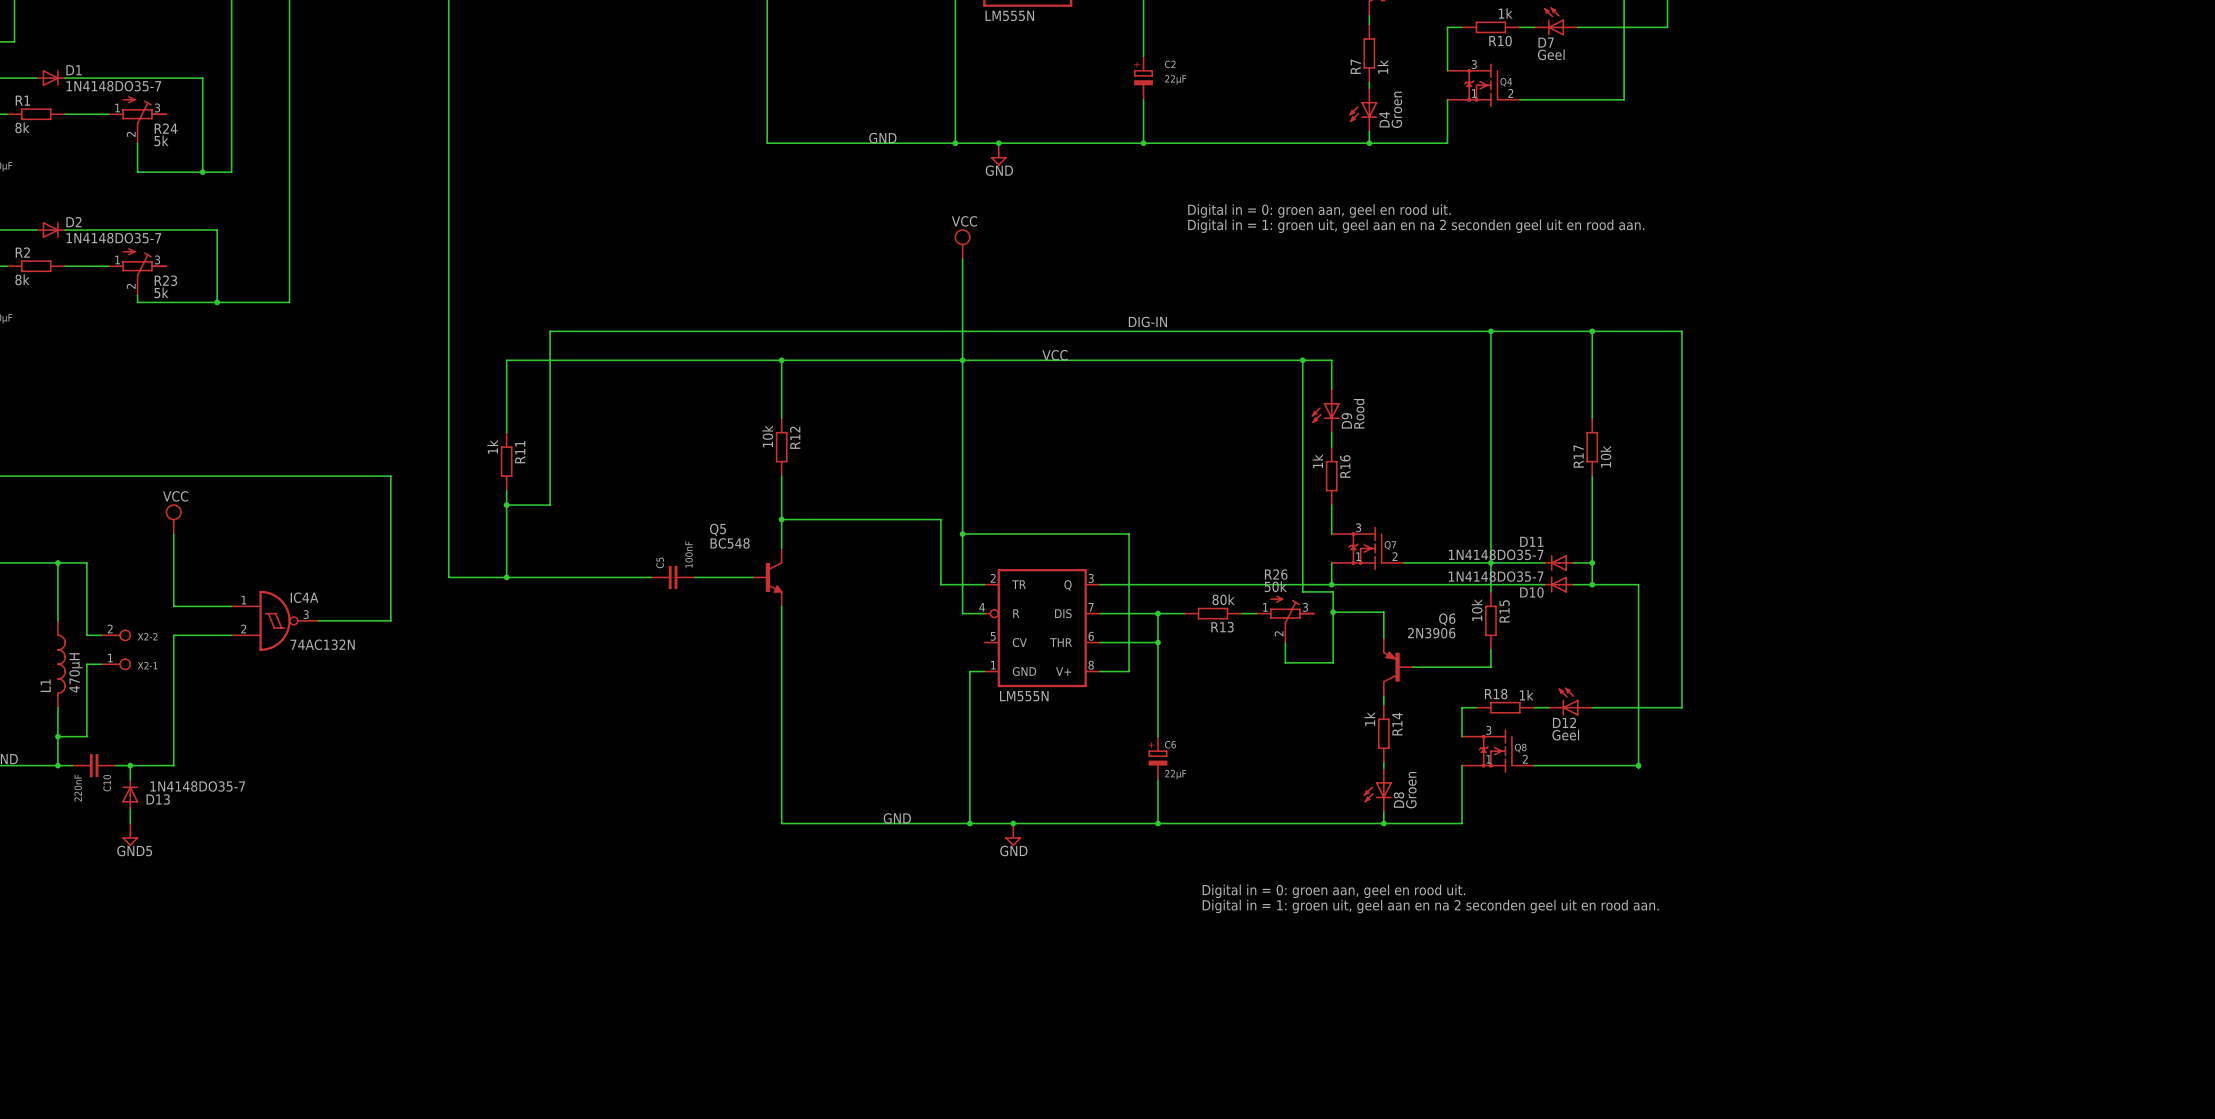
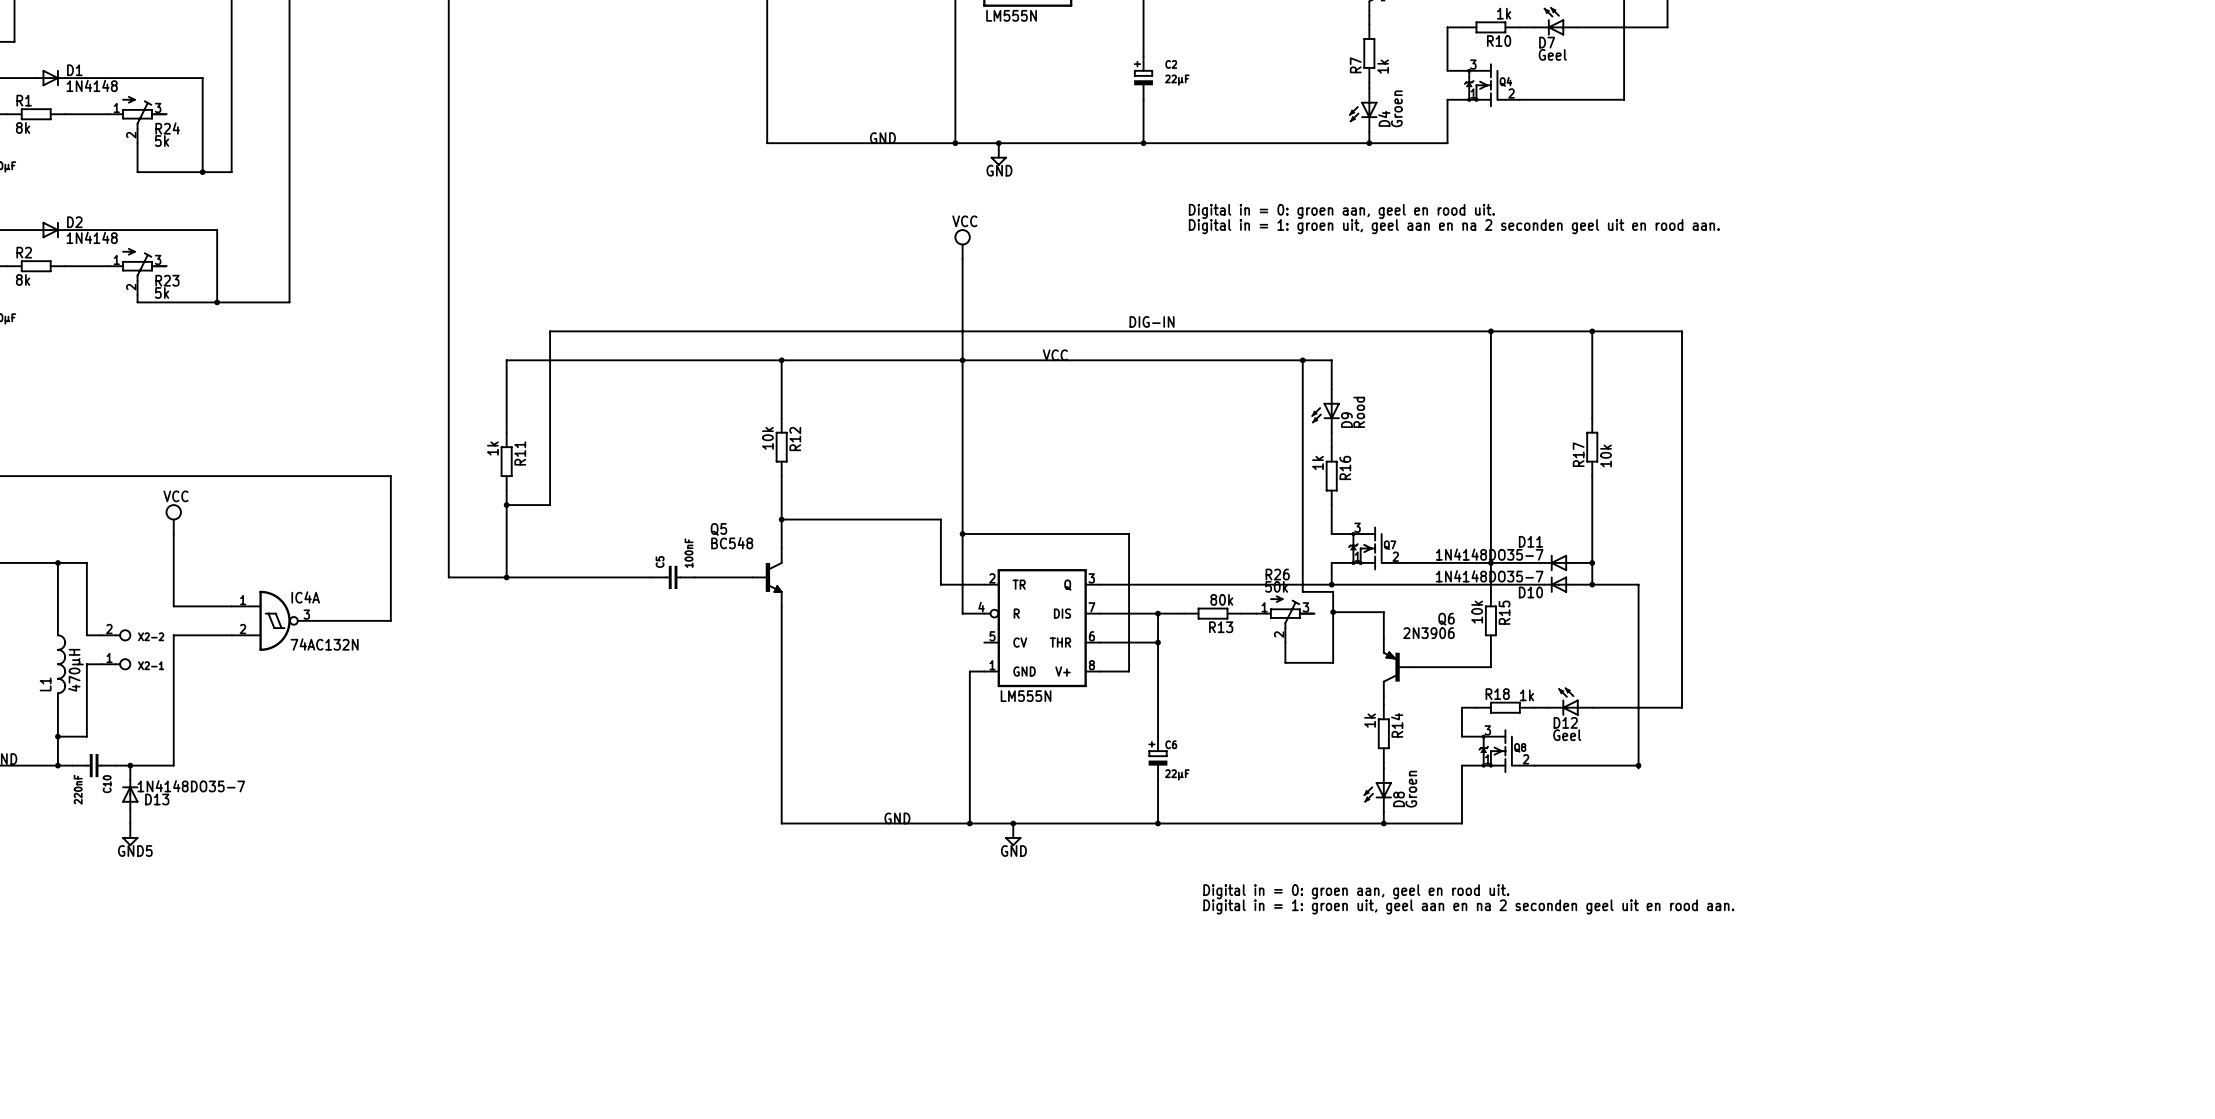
D1 value: 1N4148DO35-7 (113, 86) -> 1N4148 (92, 85)
D2 value: 1N4148DO35-7 (113, 238) -> 1N4148 (92, 237)

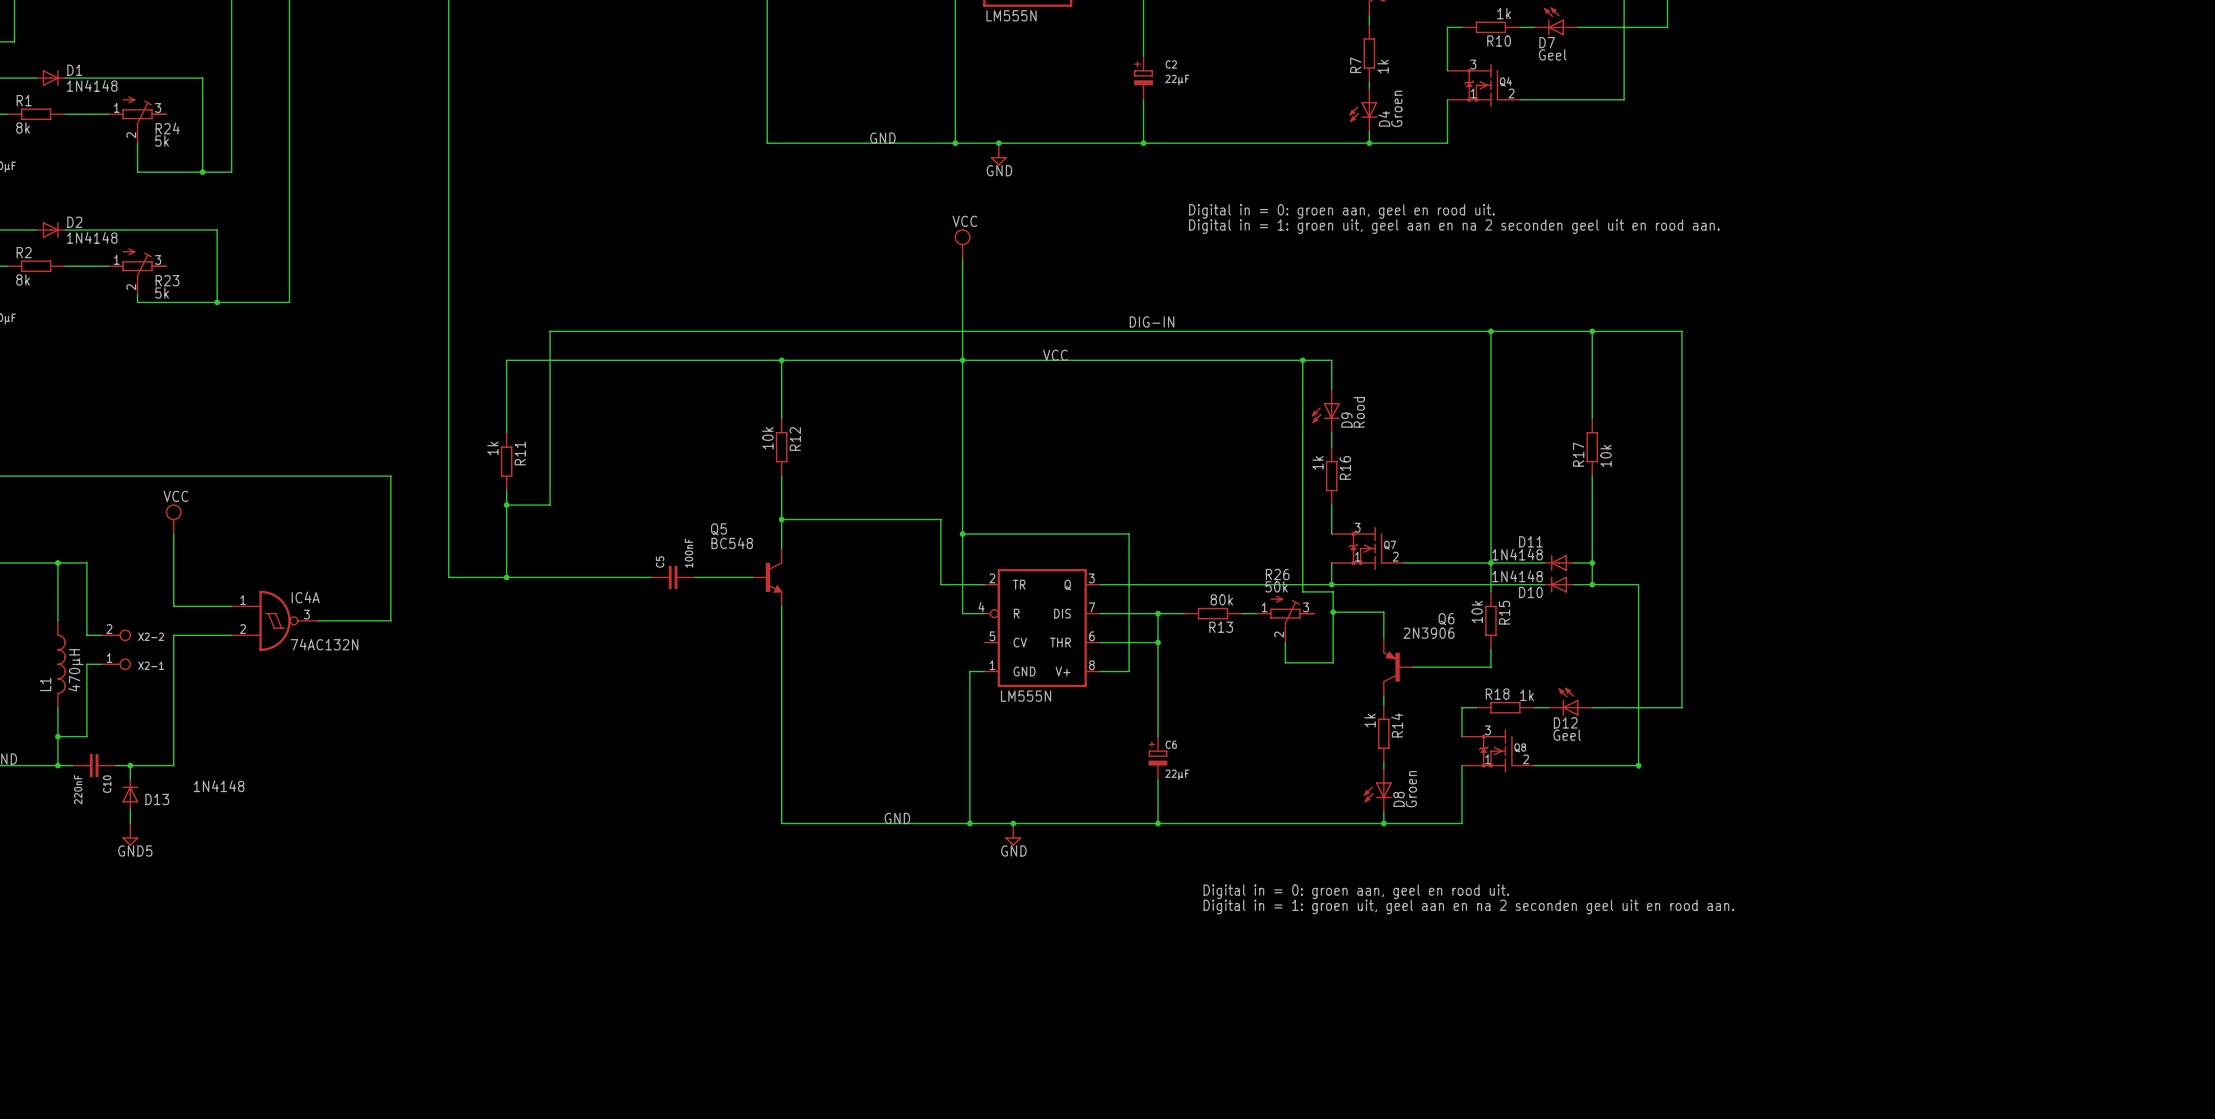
D11 value: 1N4148DO35-7 (1489, 554) -> 1N4148 (1517, 554)
D10 value: 1N4148DO35-7 (1489, 576) -> 1N4148 (1517, 576)
D13 value: 1N4148DO35-7 (191, 786) -> 1N4148 (219, 786)

